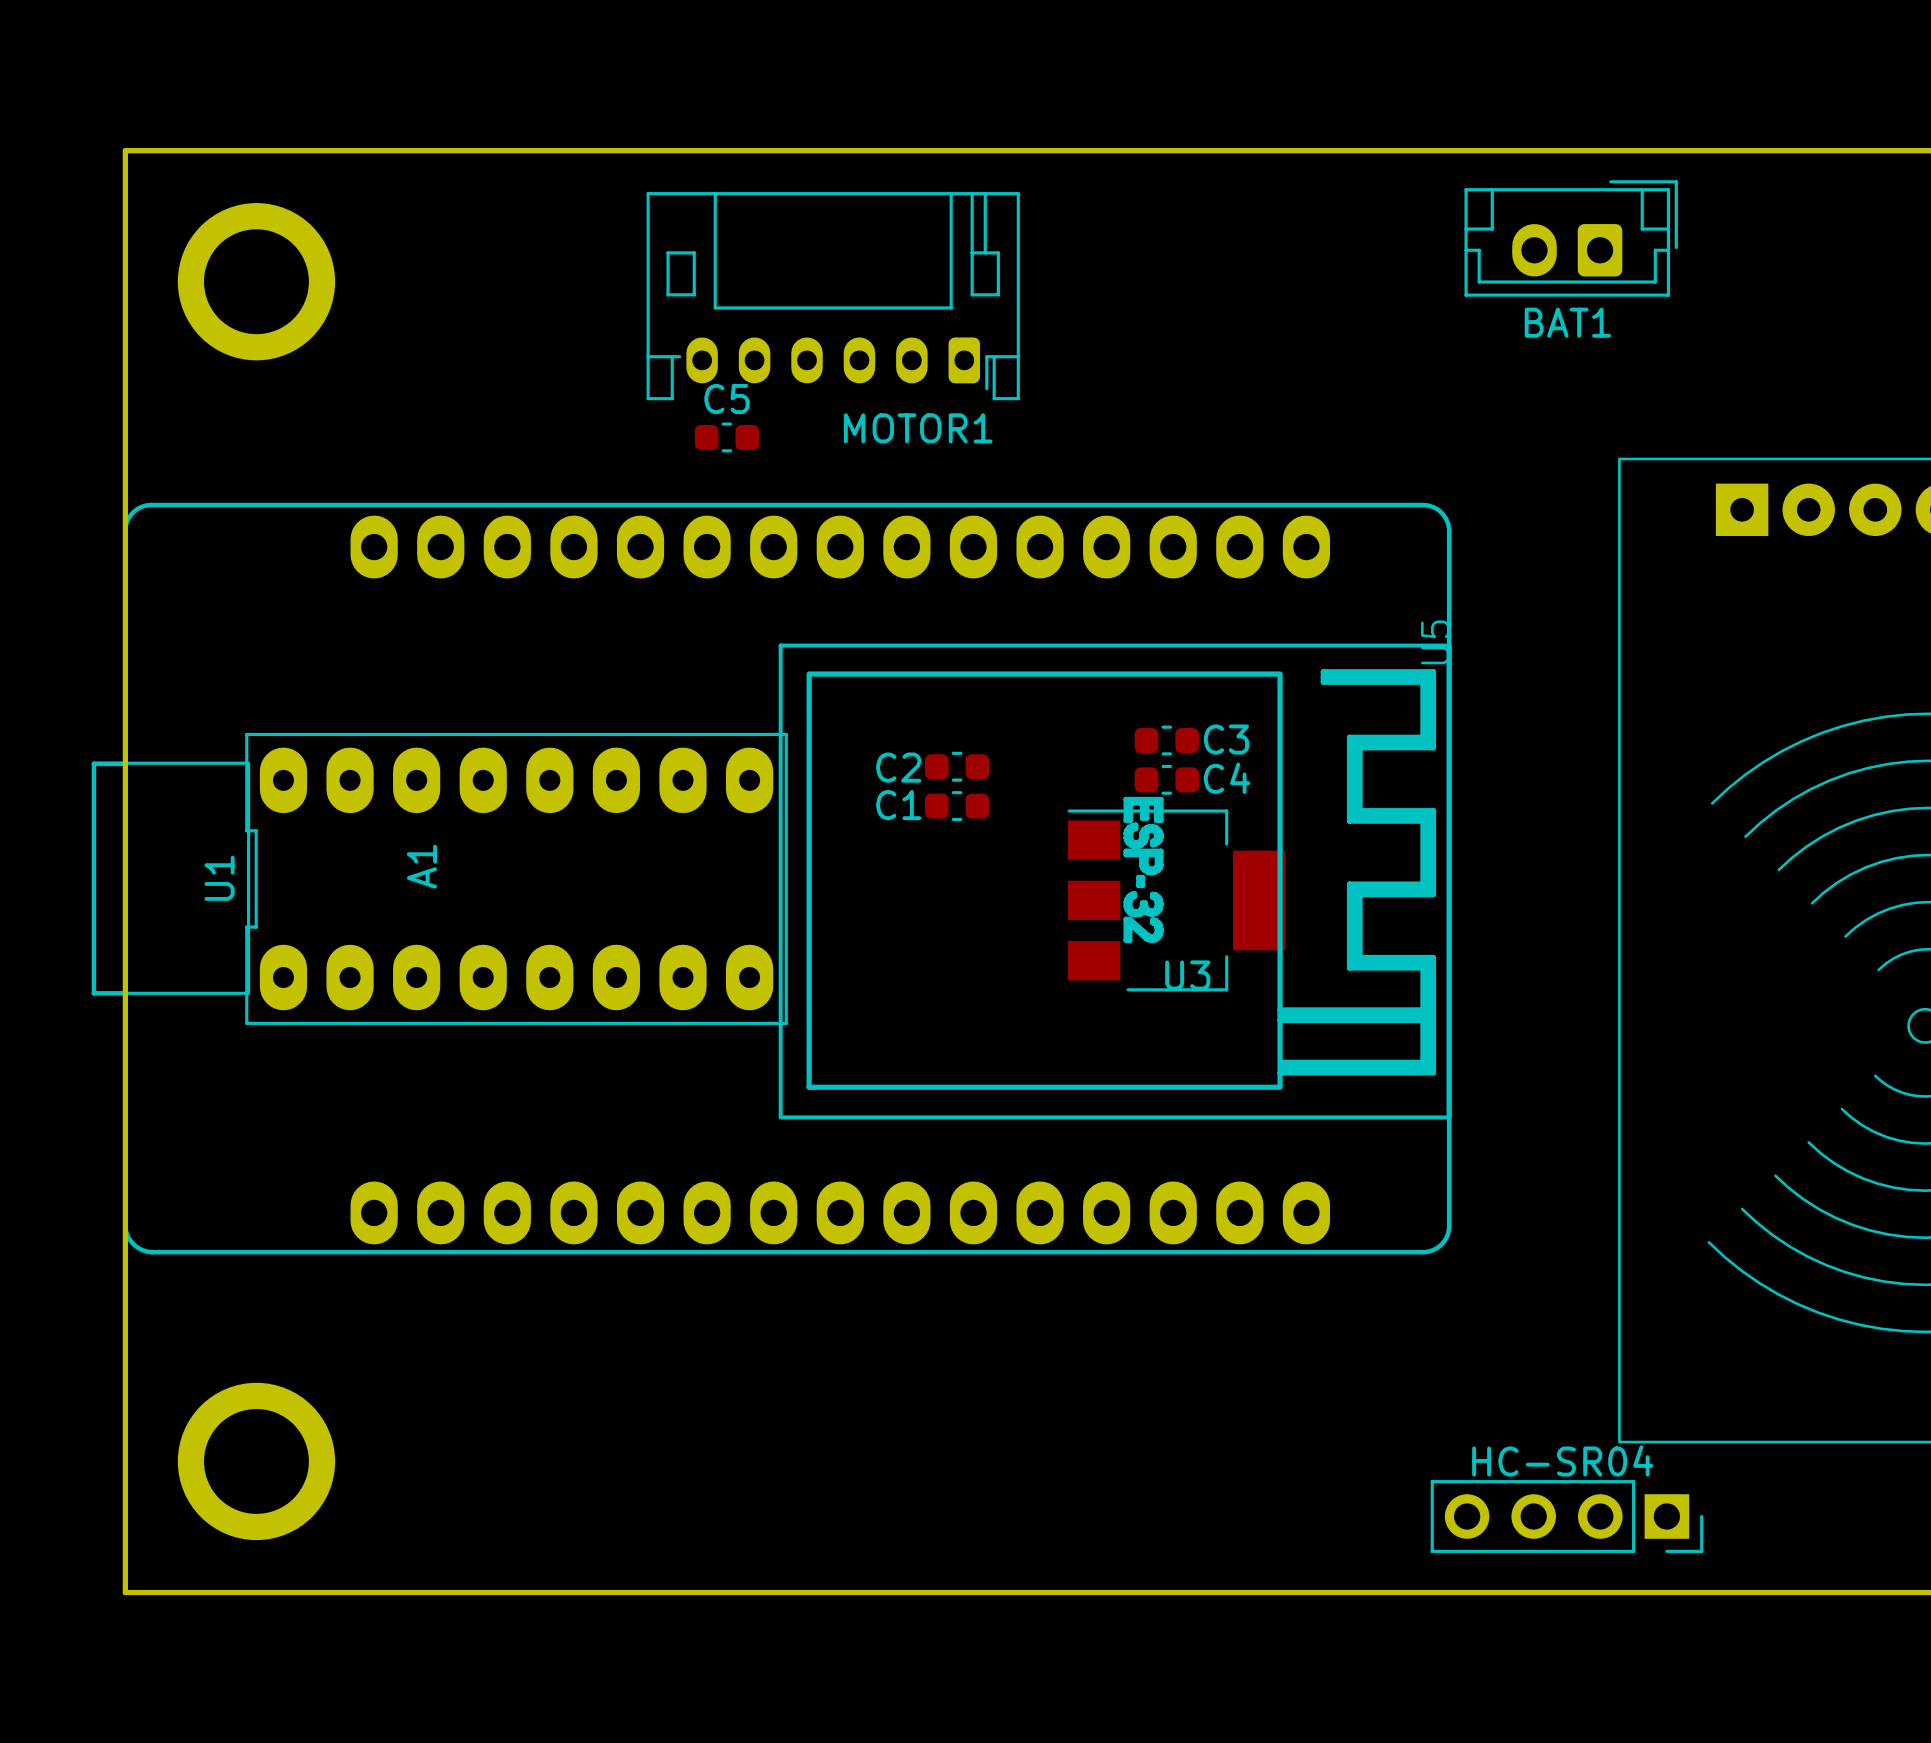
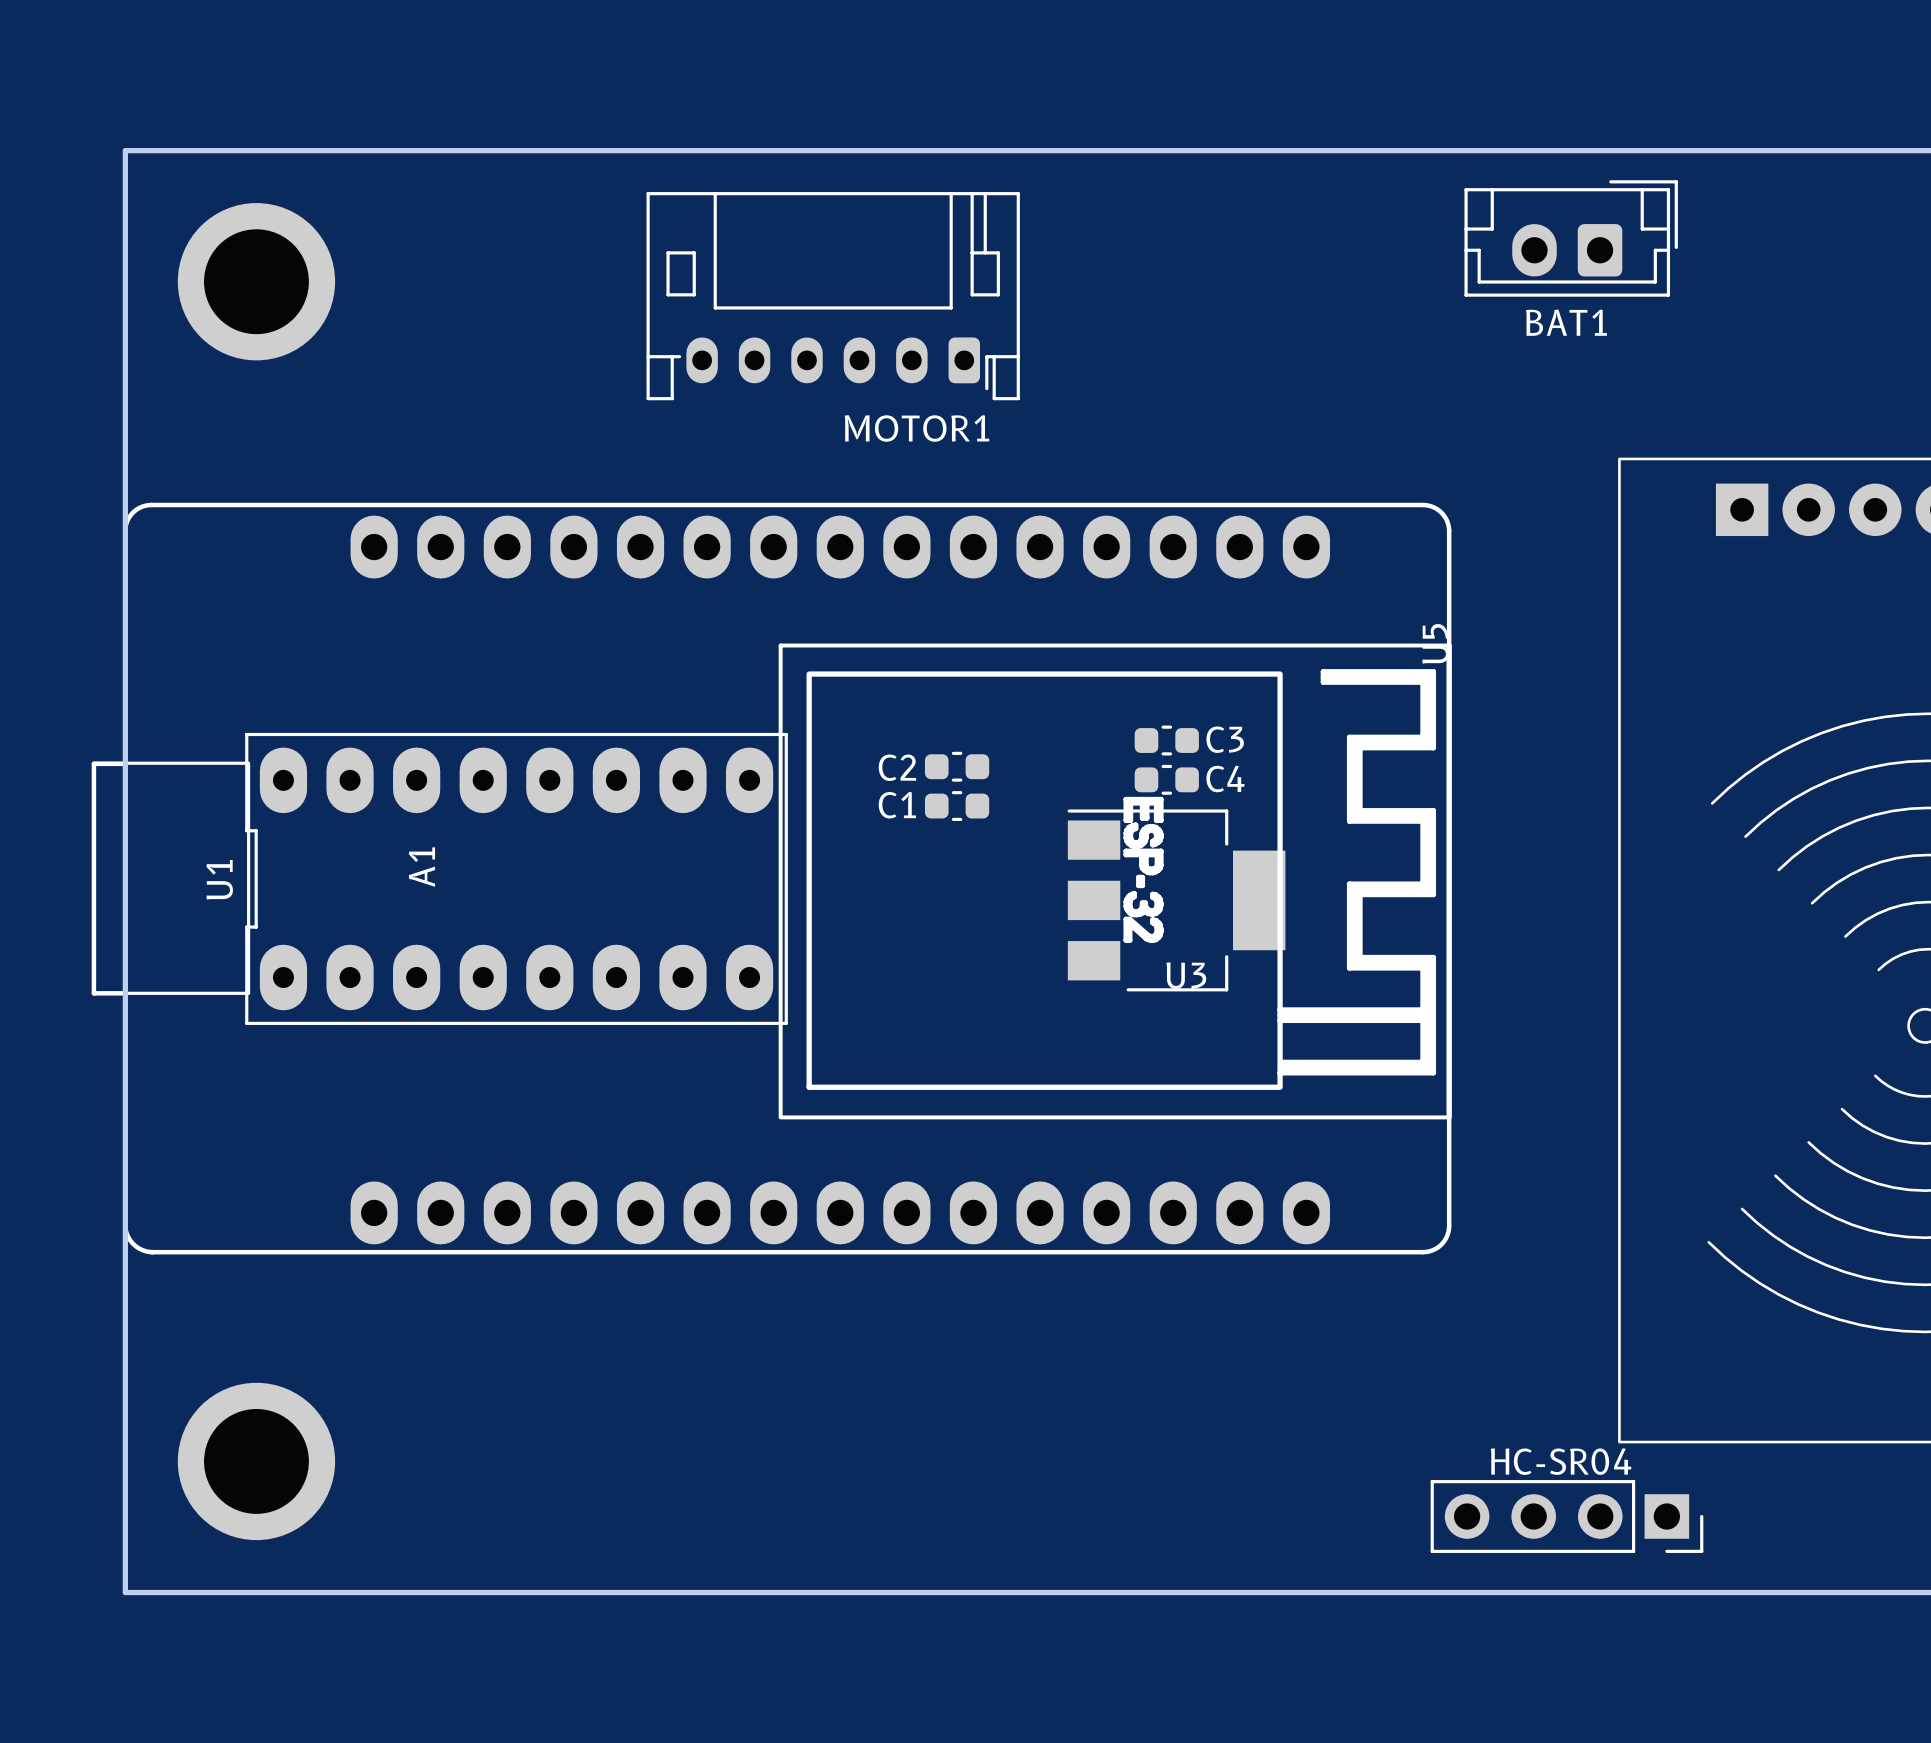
C5: (726, 437) -> none

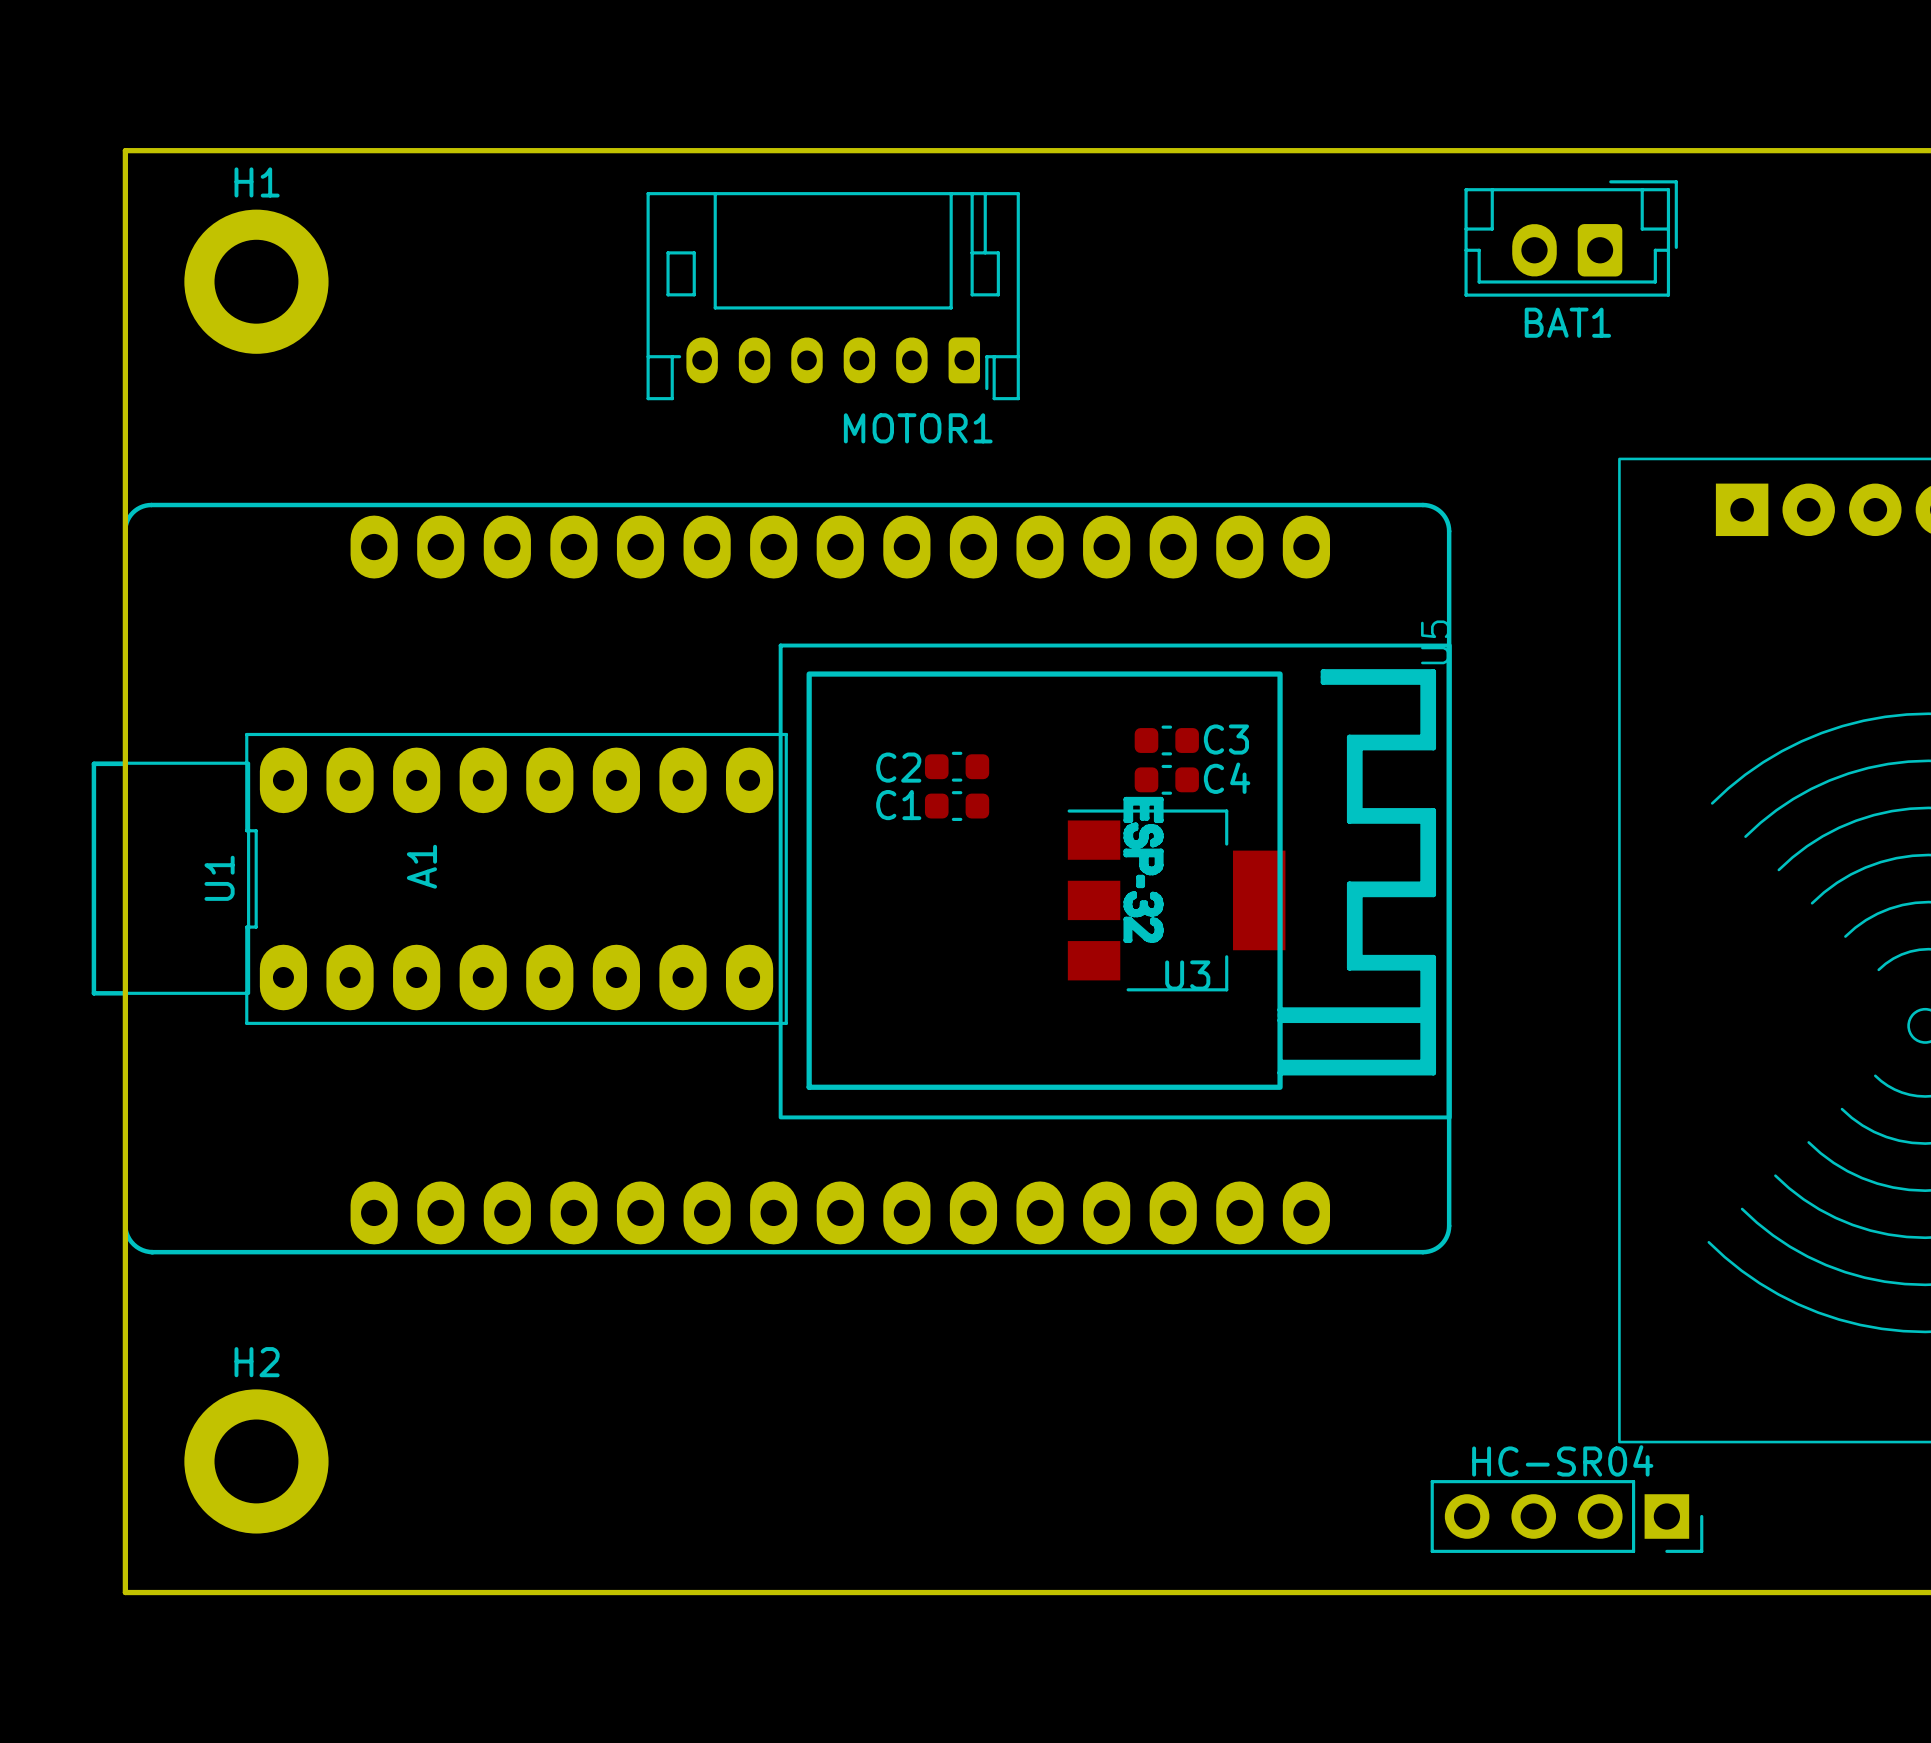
part: (256, 281) -> none
H1: none -> (256, 281)
part: (256, 1461) -> none
H2: none -> (256, 1461)

